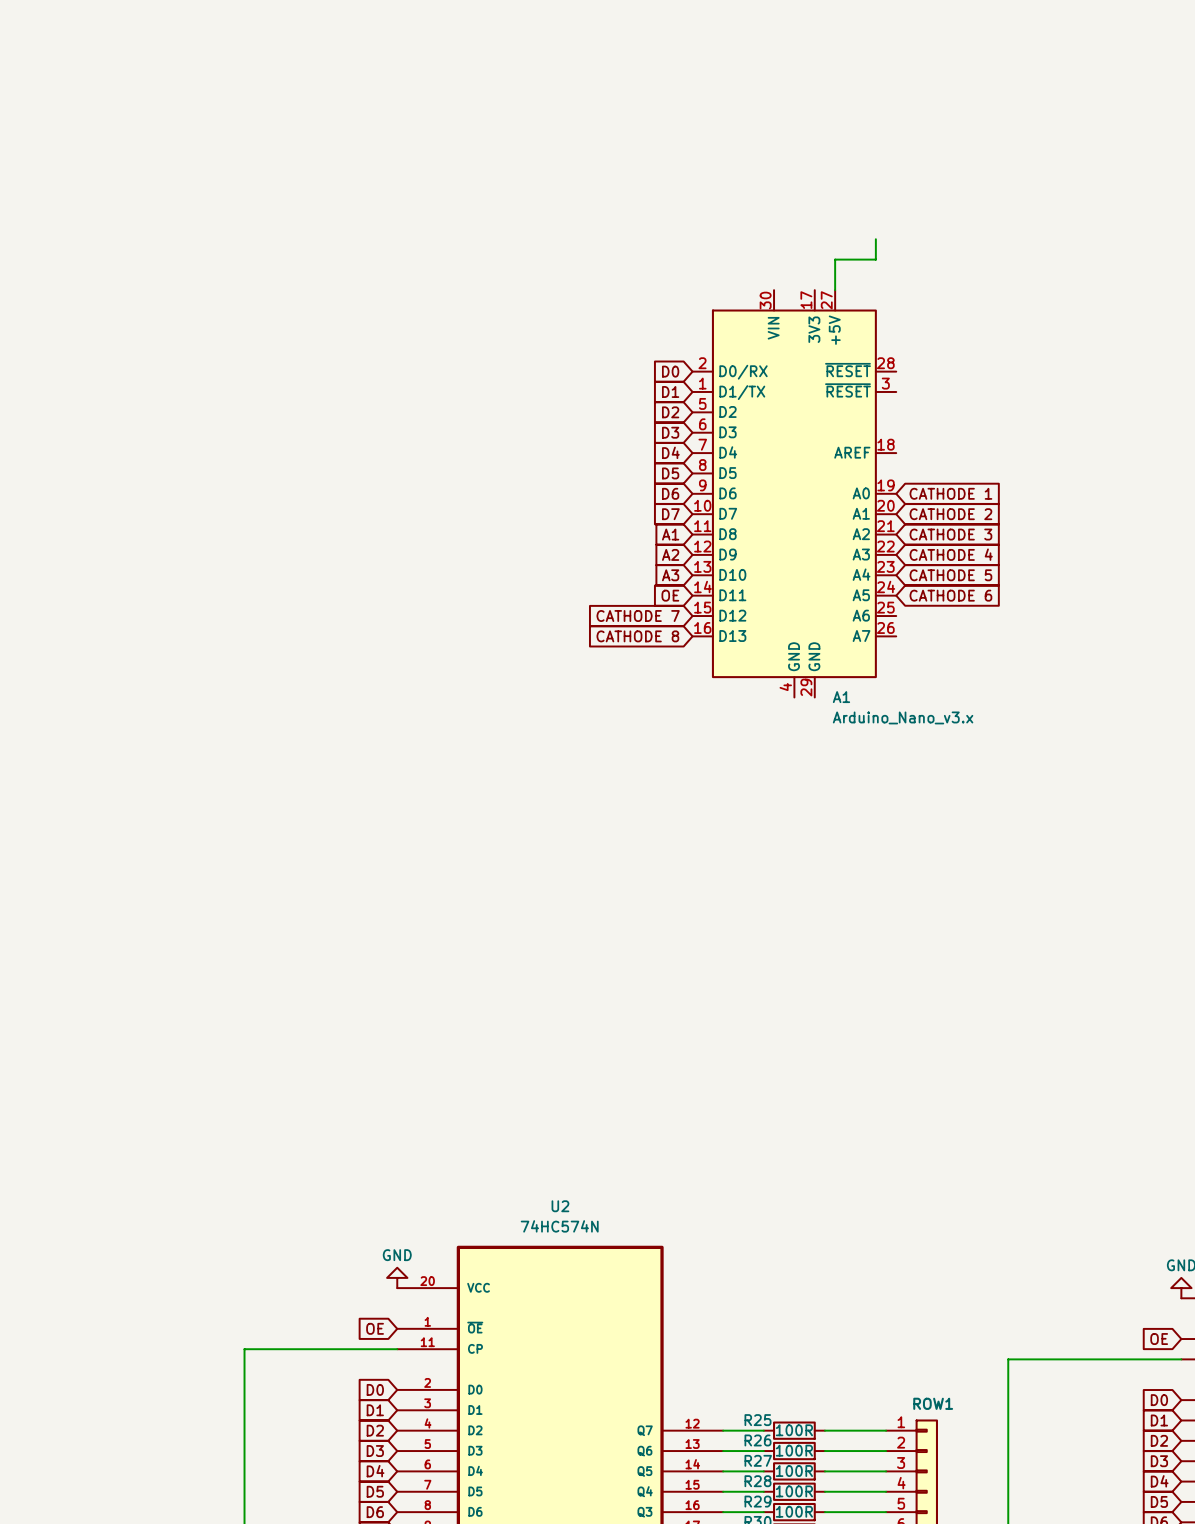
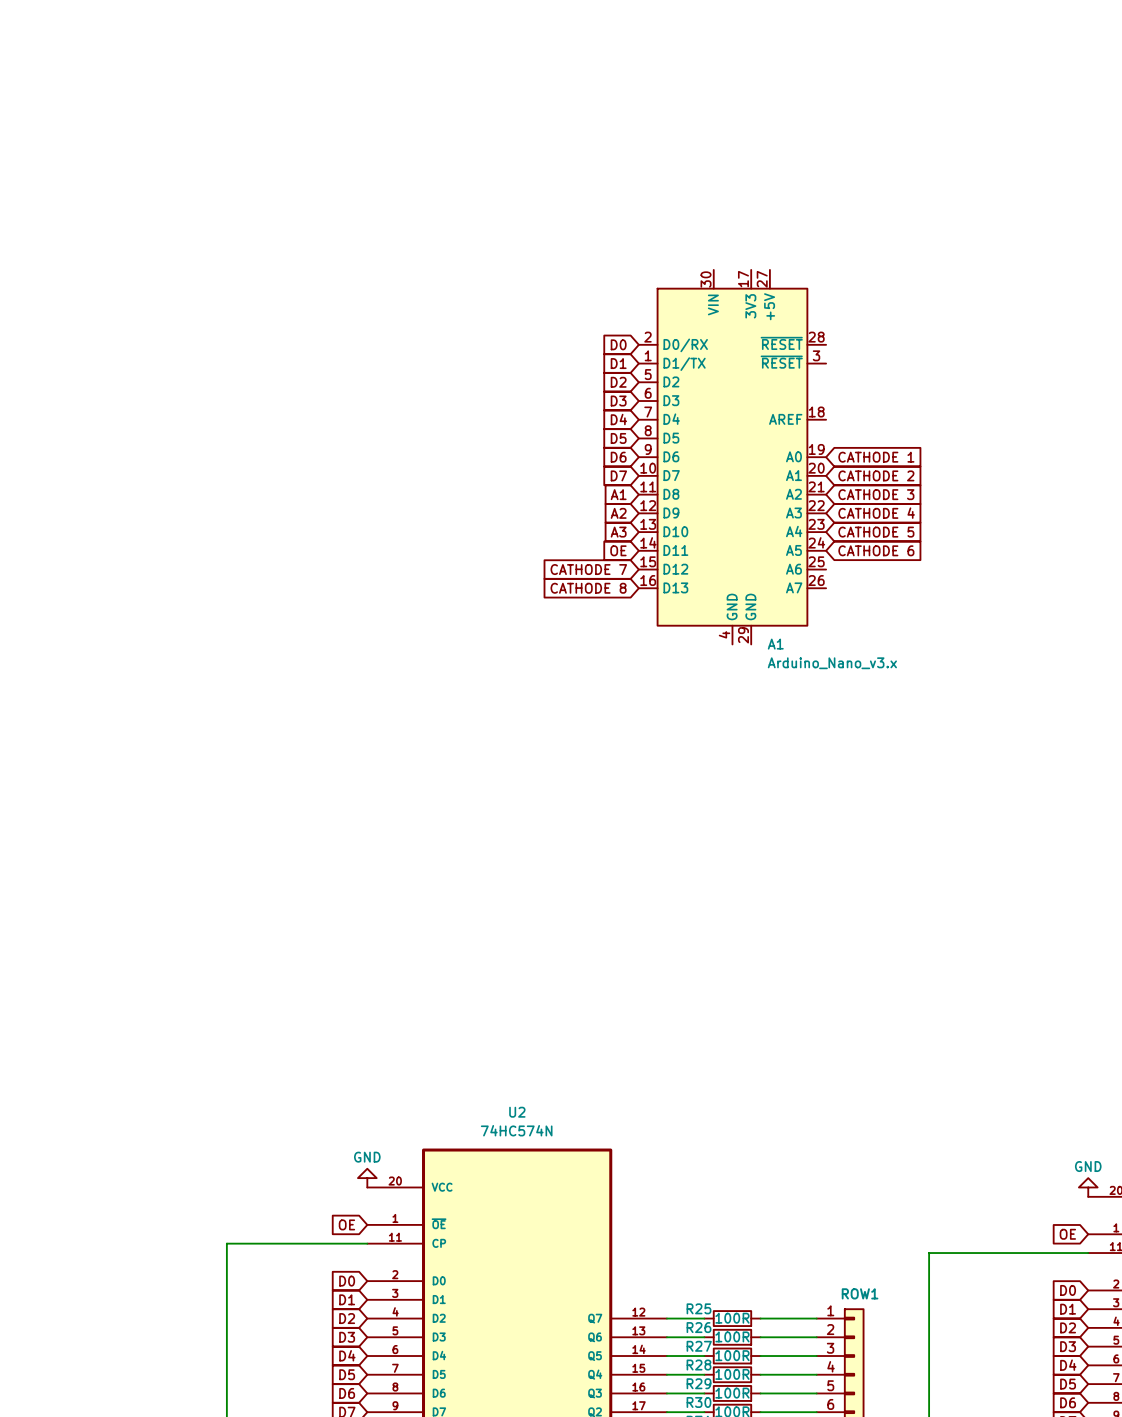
wire: (875, 239) (875, 259) (835, 259) (835, 290) -> none

